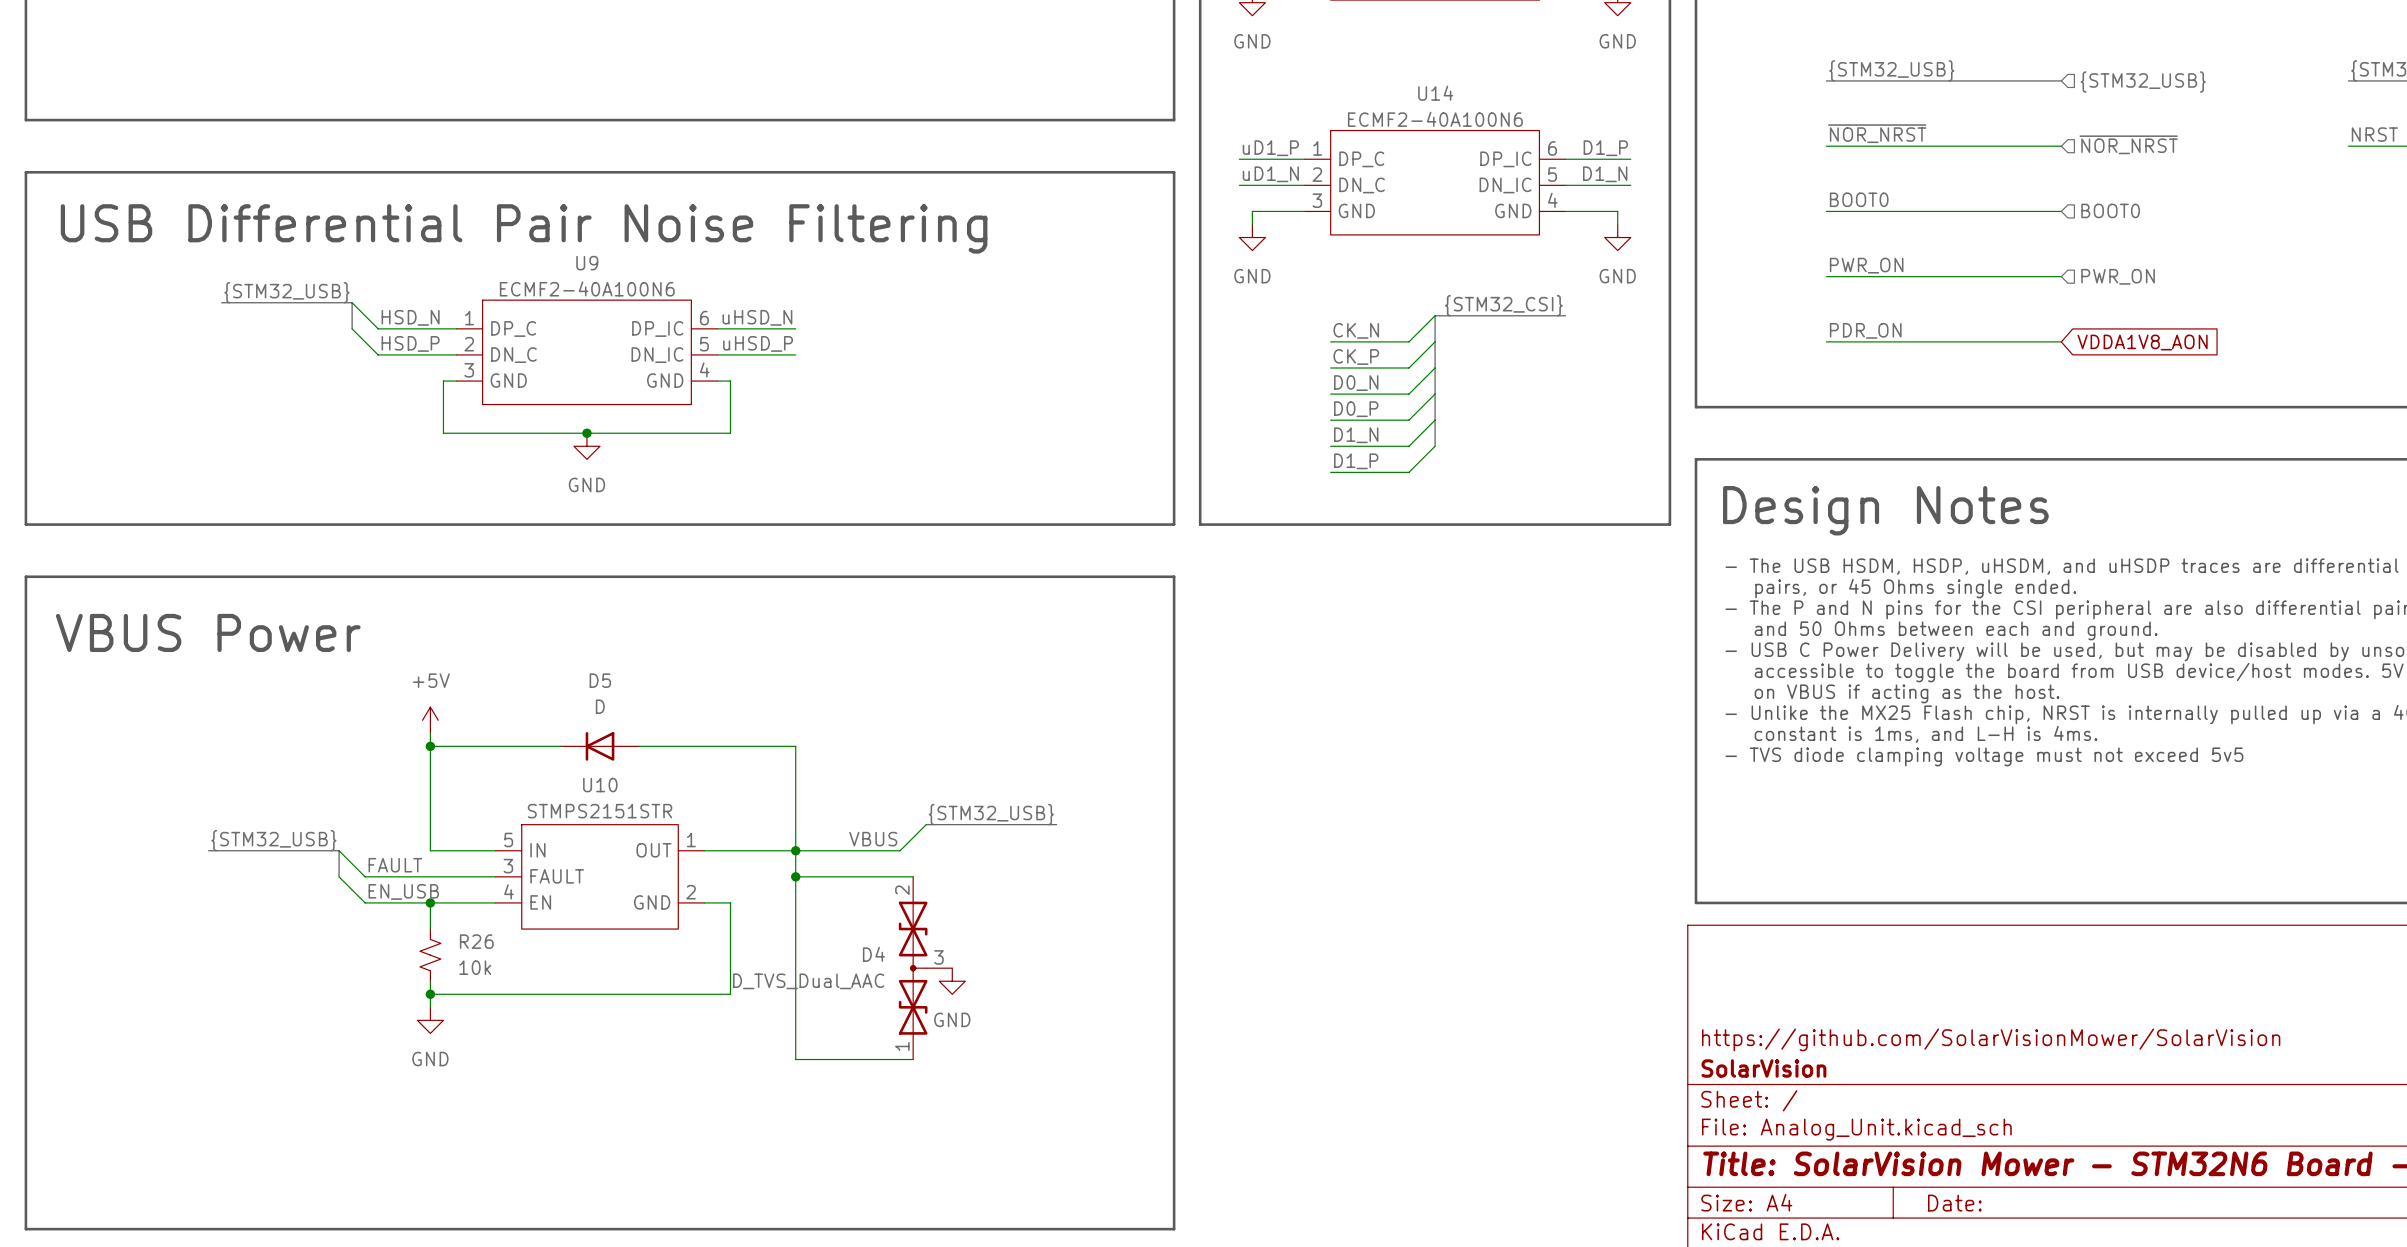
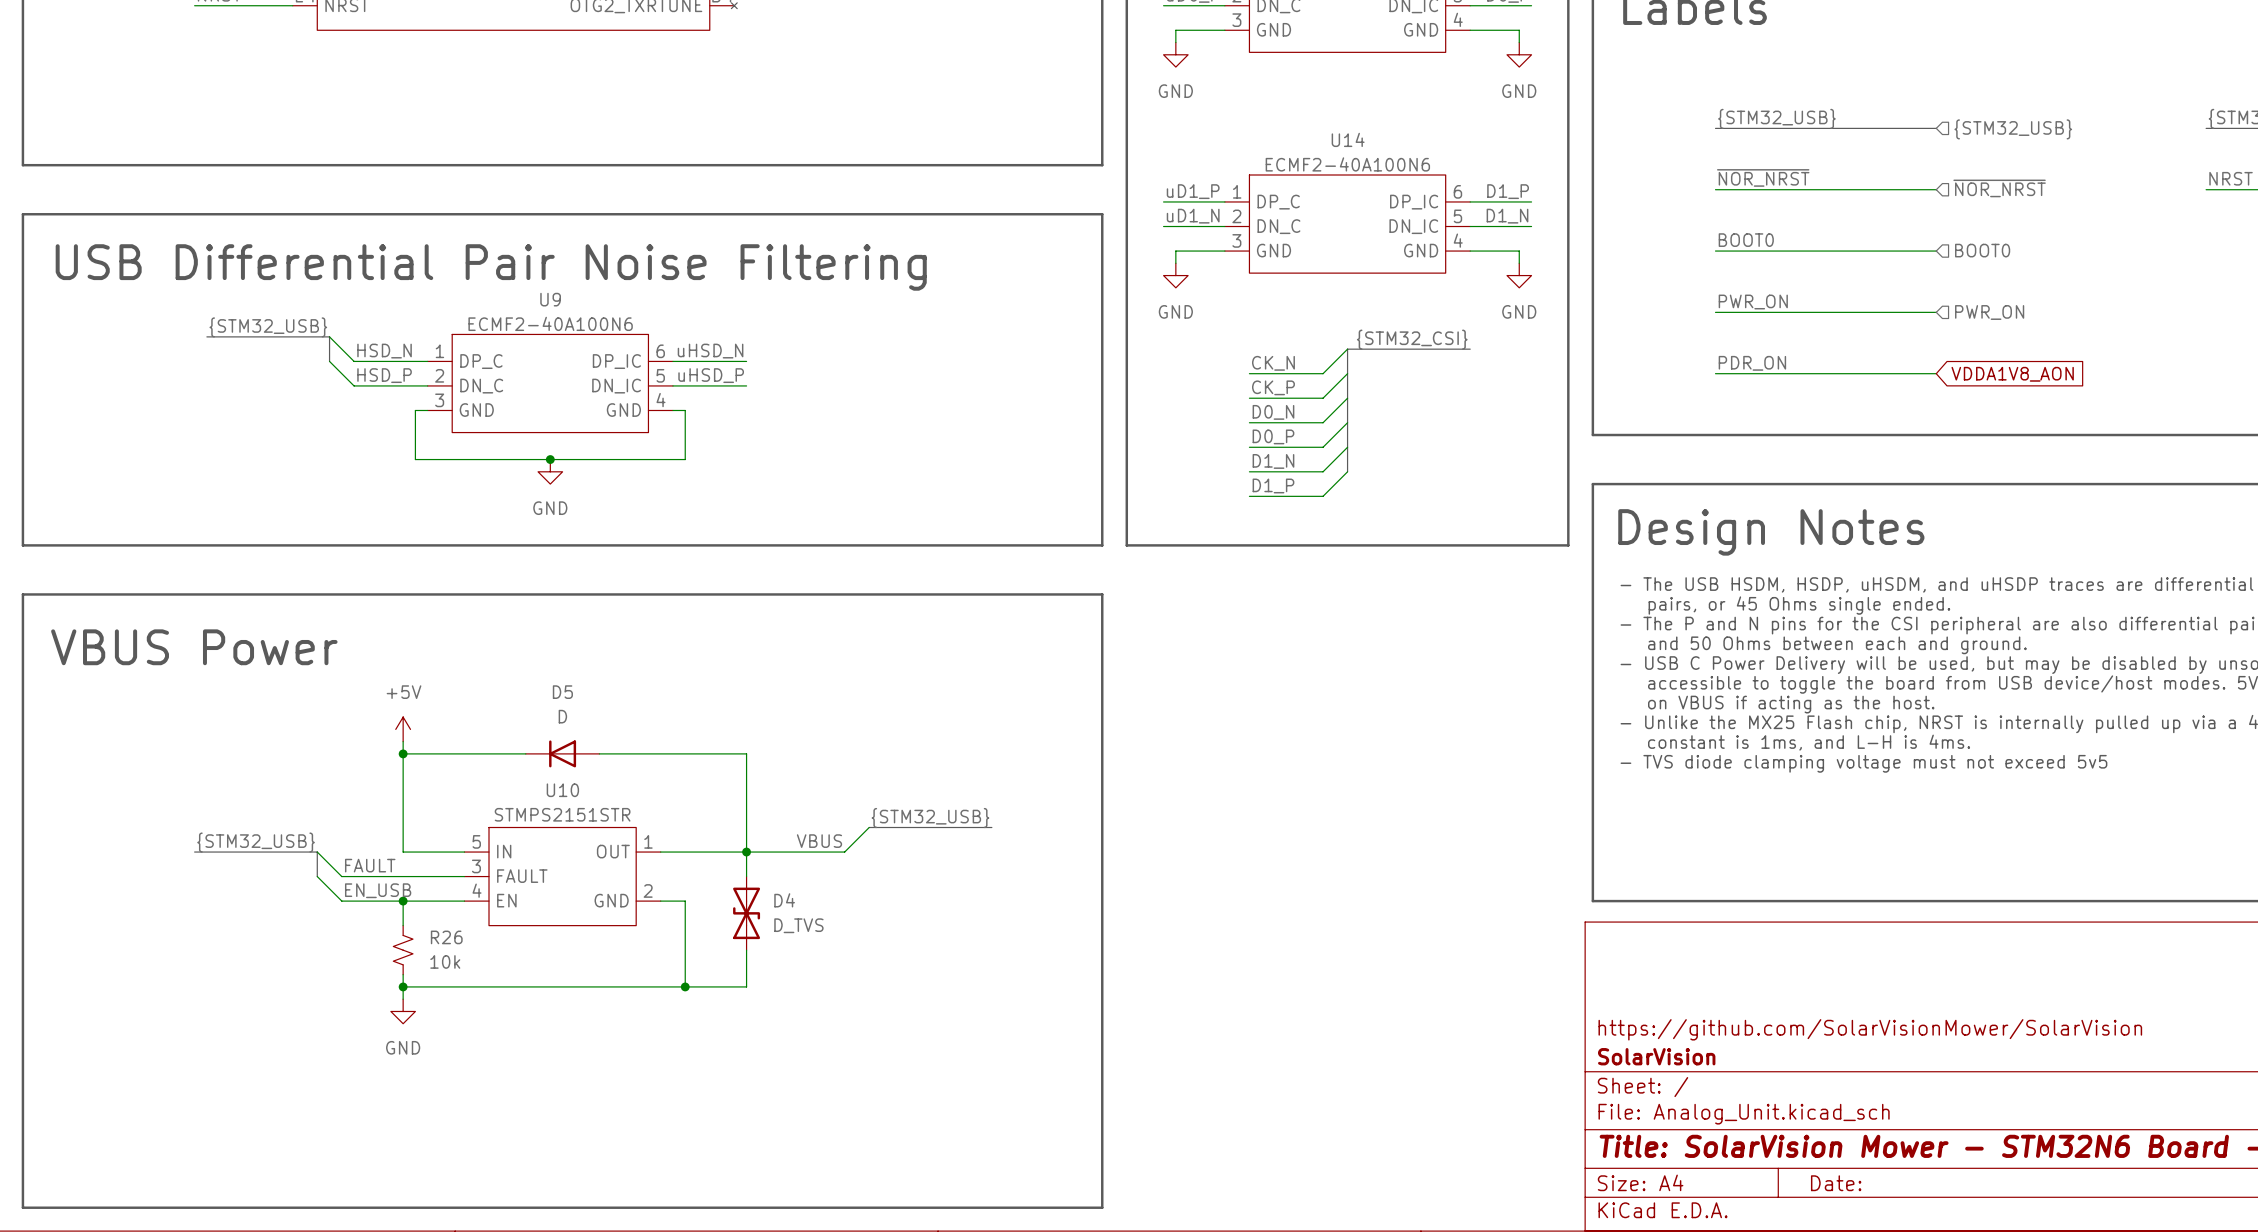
junction: (795, 876) -> none
D4 symbol: [898, 876, 953, 1060] -> [733, 876, 761, 951]
wire: (913, 876) (795, 876) (795, 955) -> none
D4 name position: D4 (873, 954) -> D4 (784, 900)
D4 value: D_TVS_Dual_AAC (808, 981) -> D_TVS (798, 925)
power symbol: GND (952, 981) -> none
junction: none -> (685, 986)
wire: (795, 994) (795, 1059) (913, 1059) -> (746, 986) (685, 986)

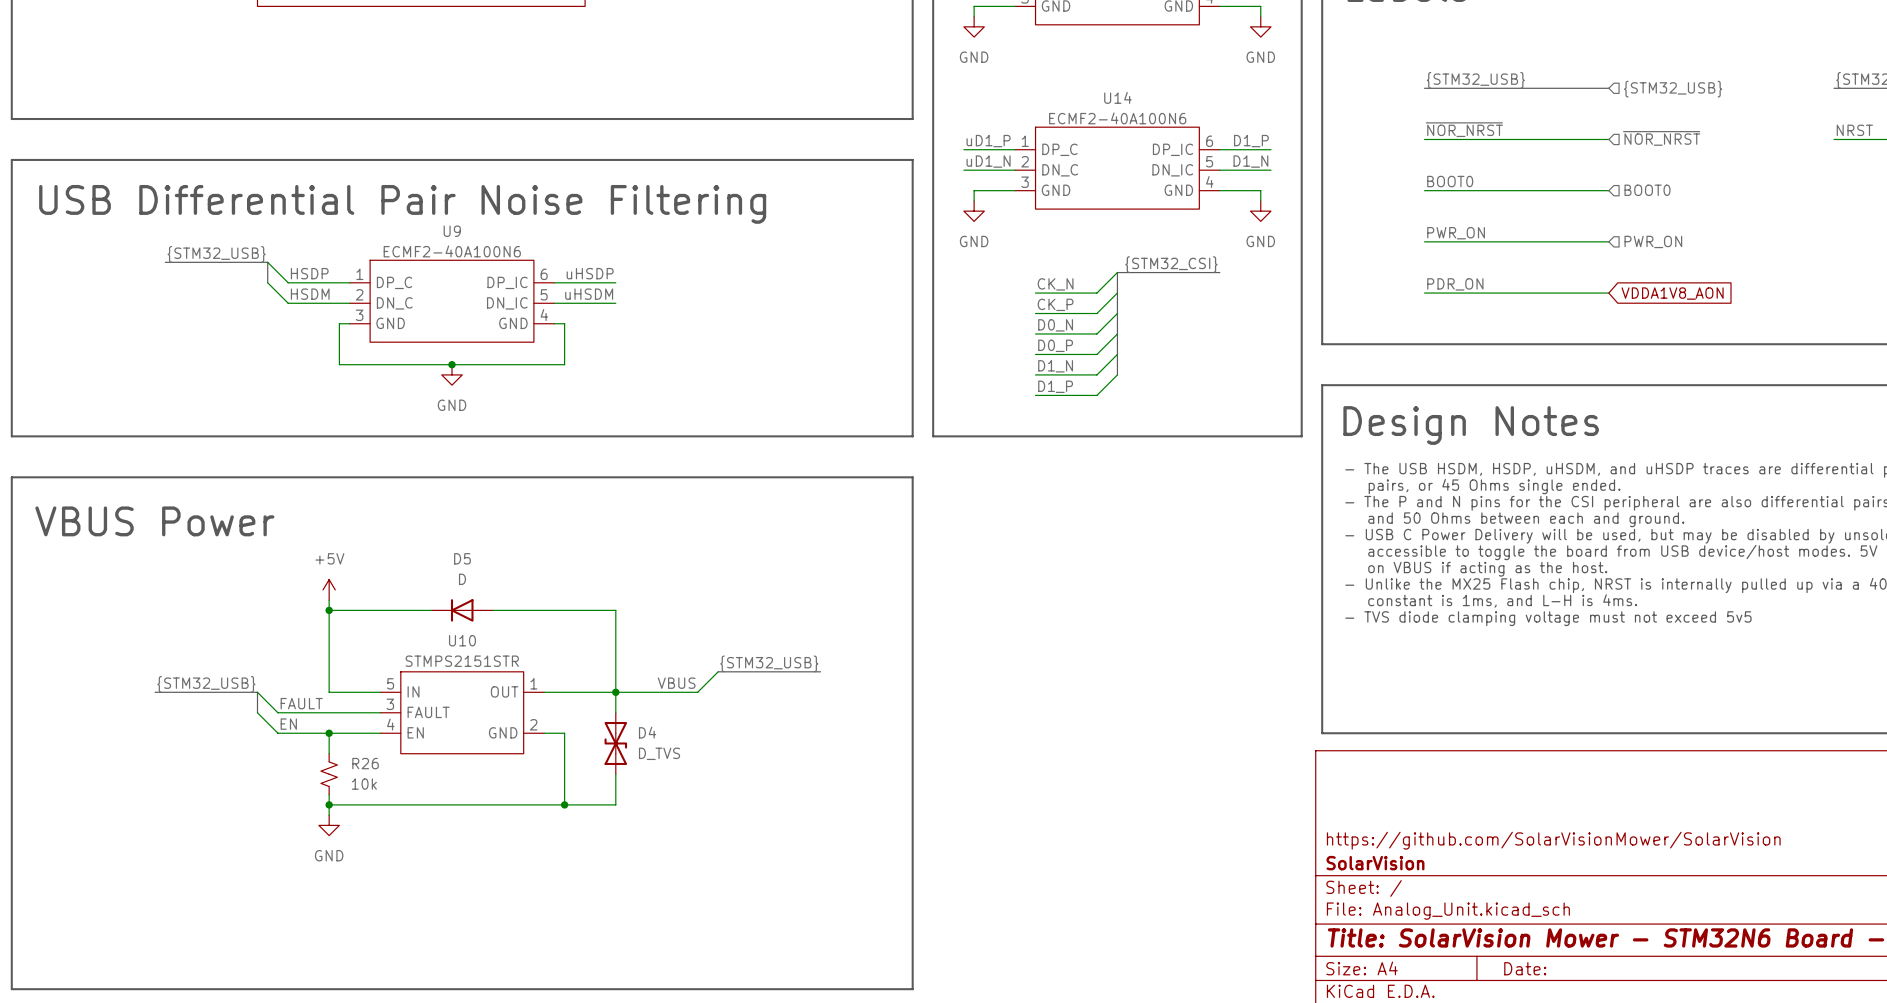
label: HSD_N (384, 351) -> HSDP (309, 273)
label: uHSD_N (710, 351) -> uHSDP (590, 273)
label: HSD_P (384, 375) -> HSDM (310, 294)
label: uHSD_P (711, 375) -> uHSDM (589, 294)
label: EN_USB (378, 890) -> EN (288, 724)

